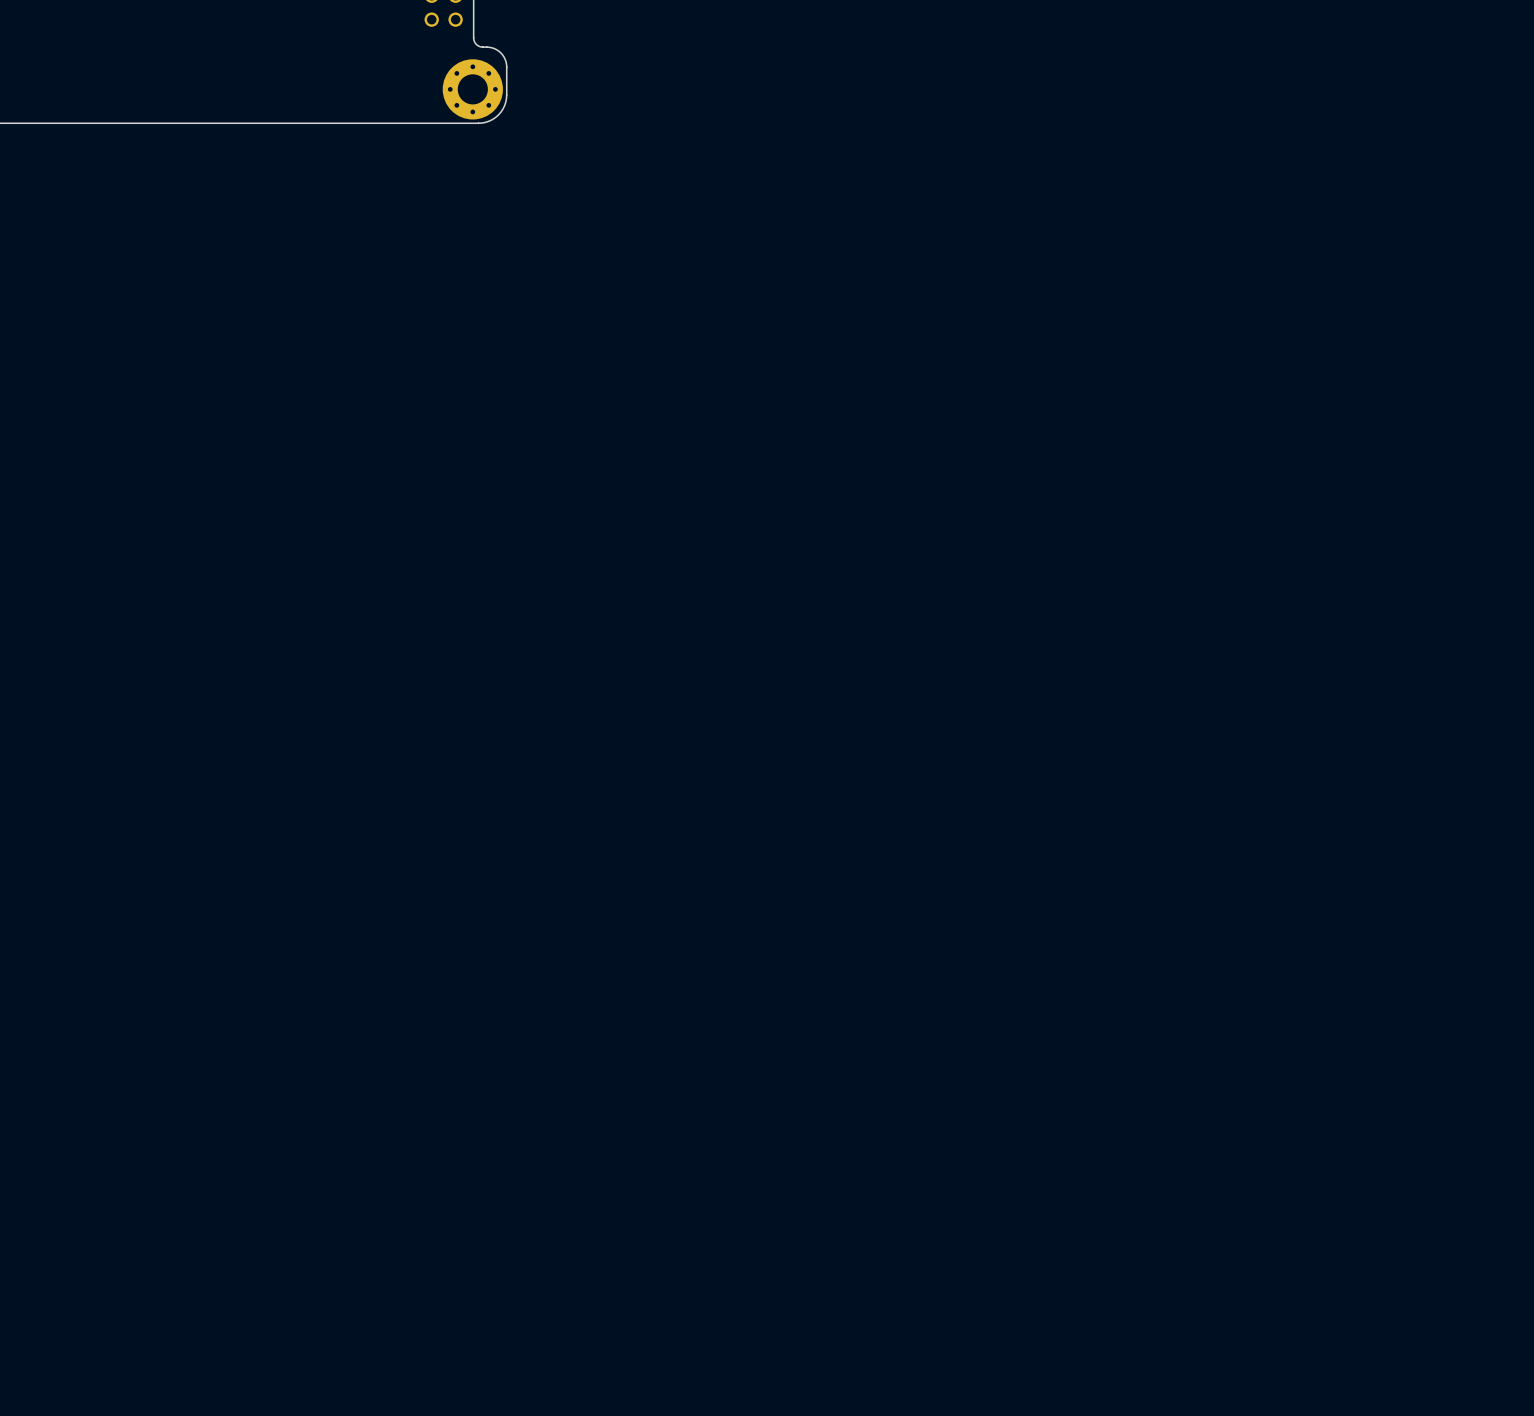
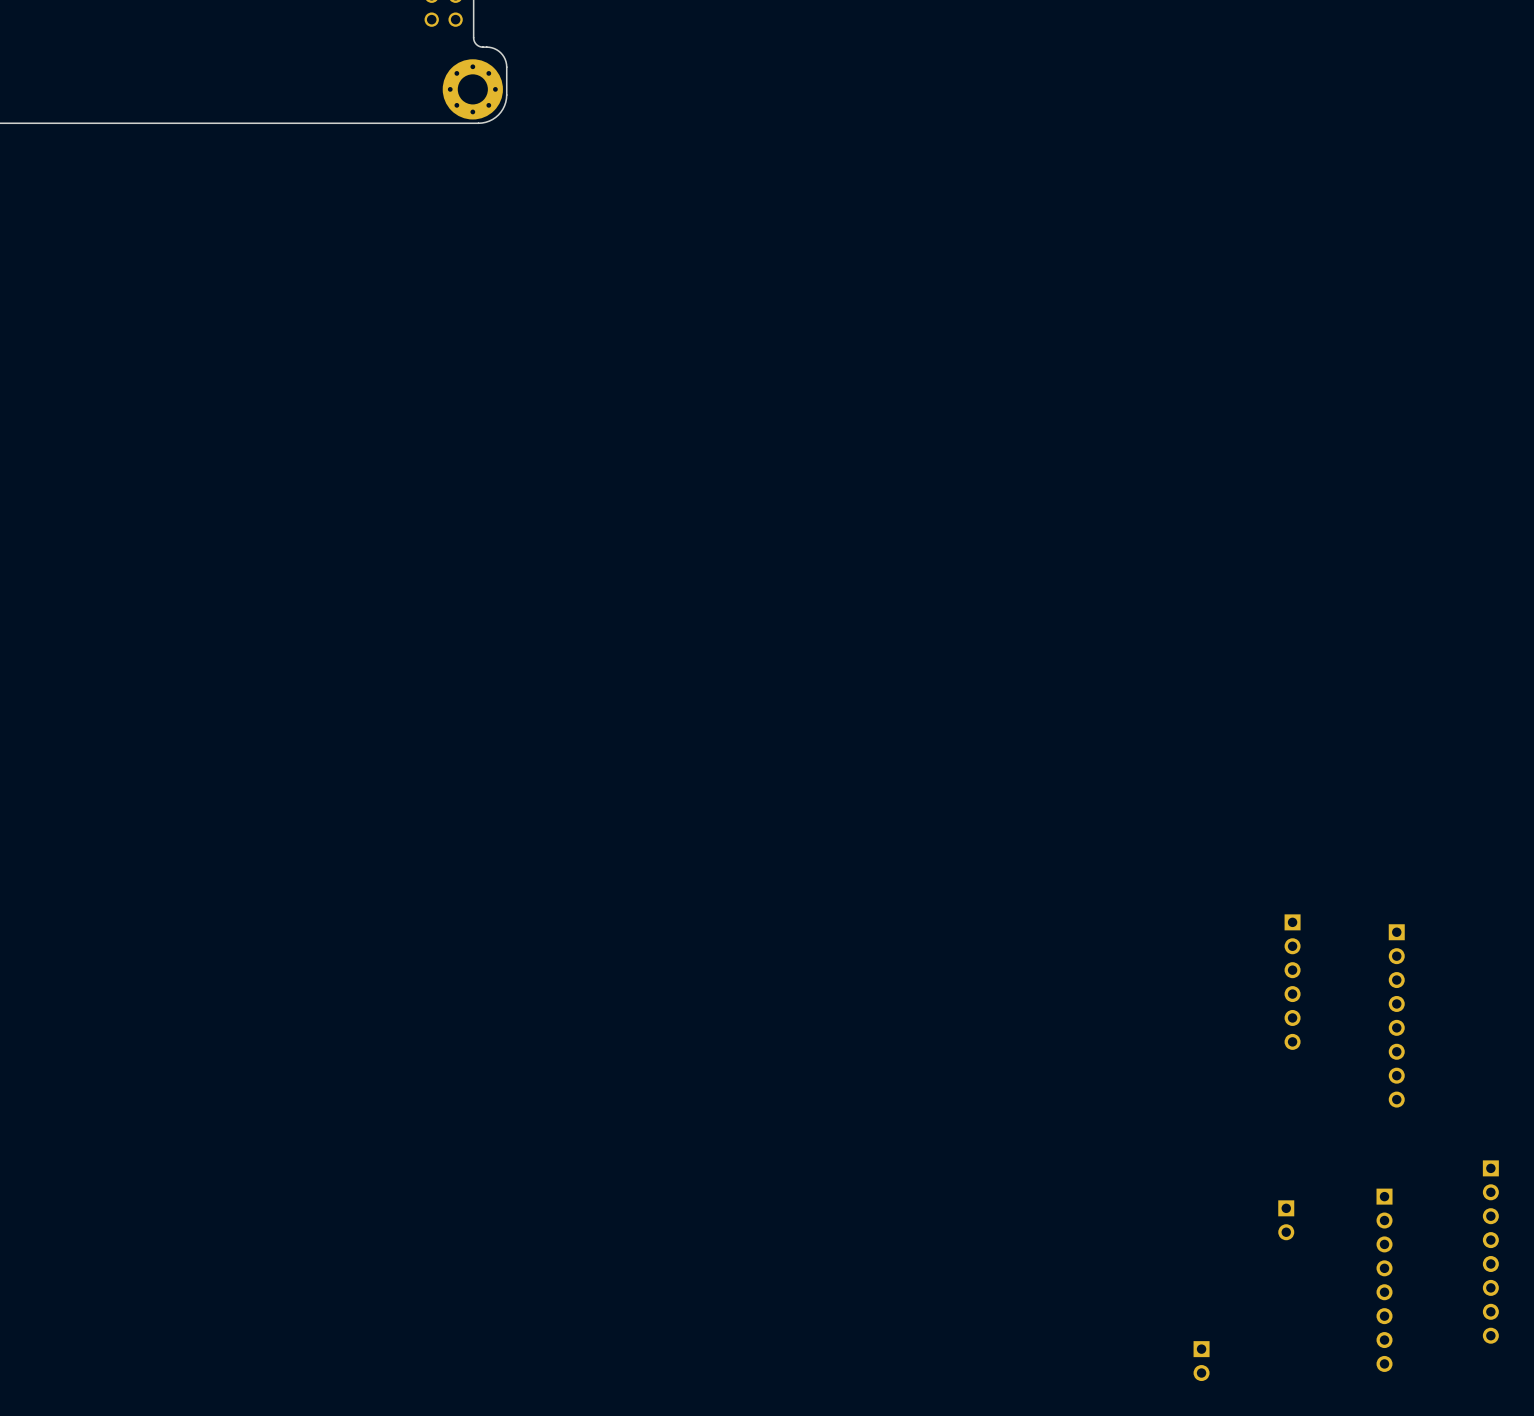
part: none -> (1292, 982)
part: none -> (1396, 1015)
part: none -> (1286, 1220)
part: none -> (1490, 1252)
part: none -> (1384, 1280)
part: none -> (1201, 1361)

